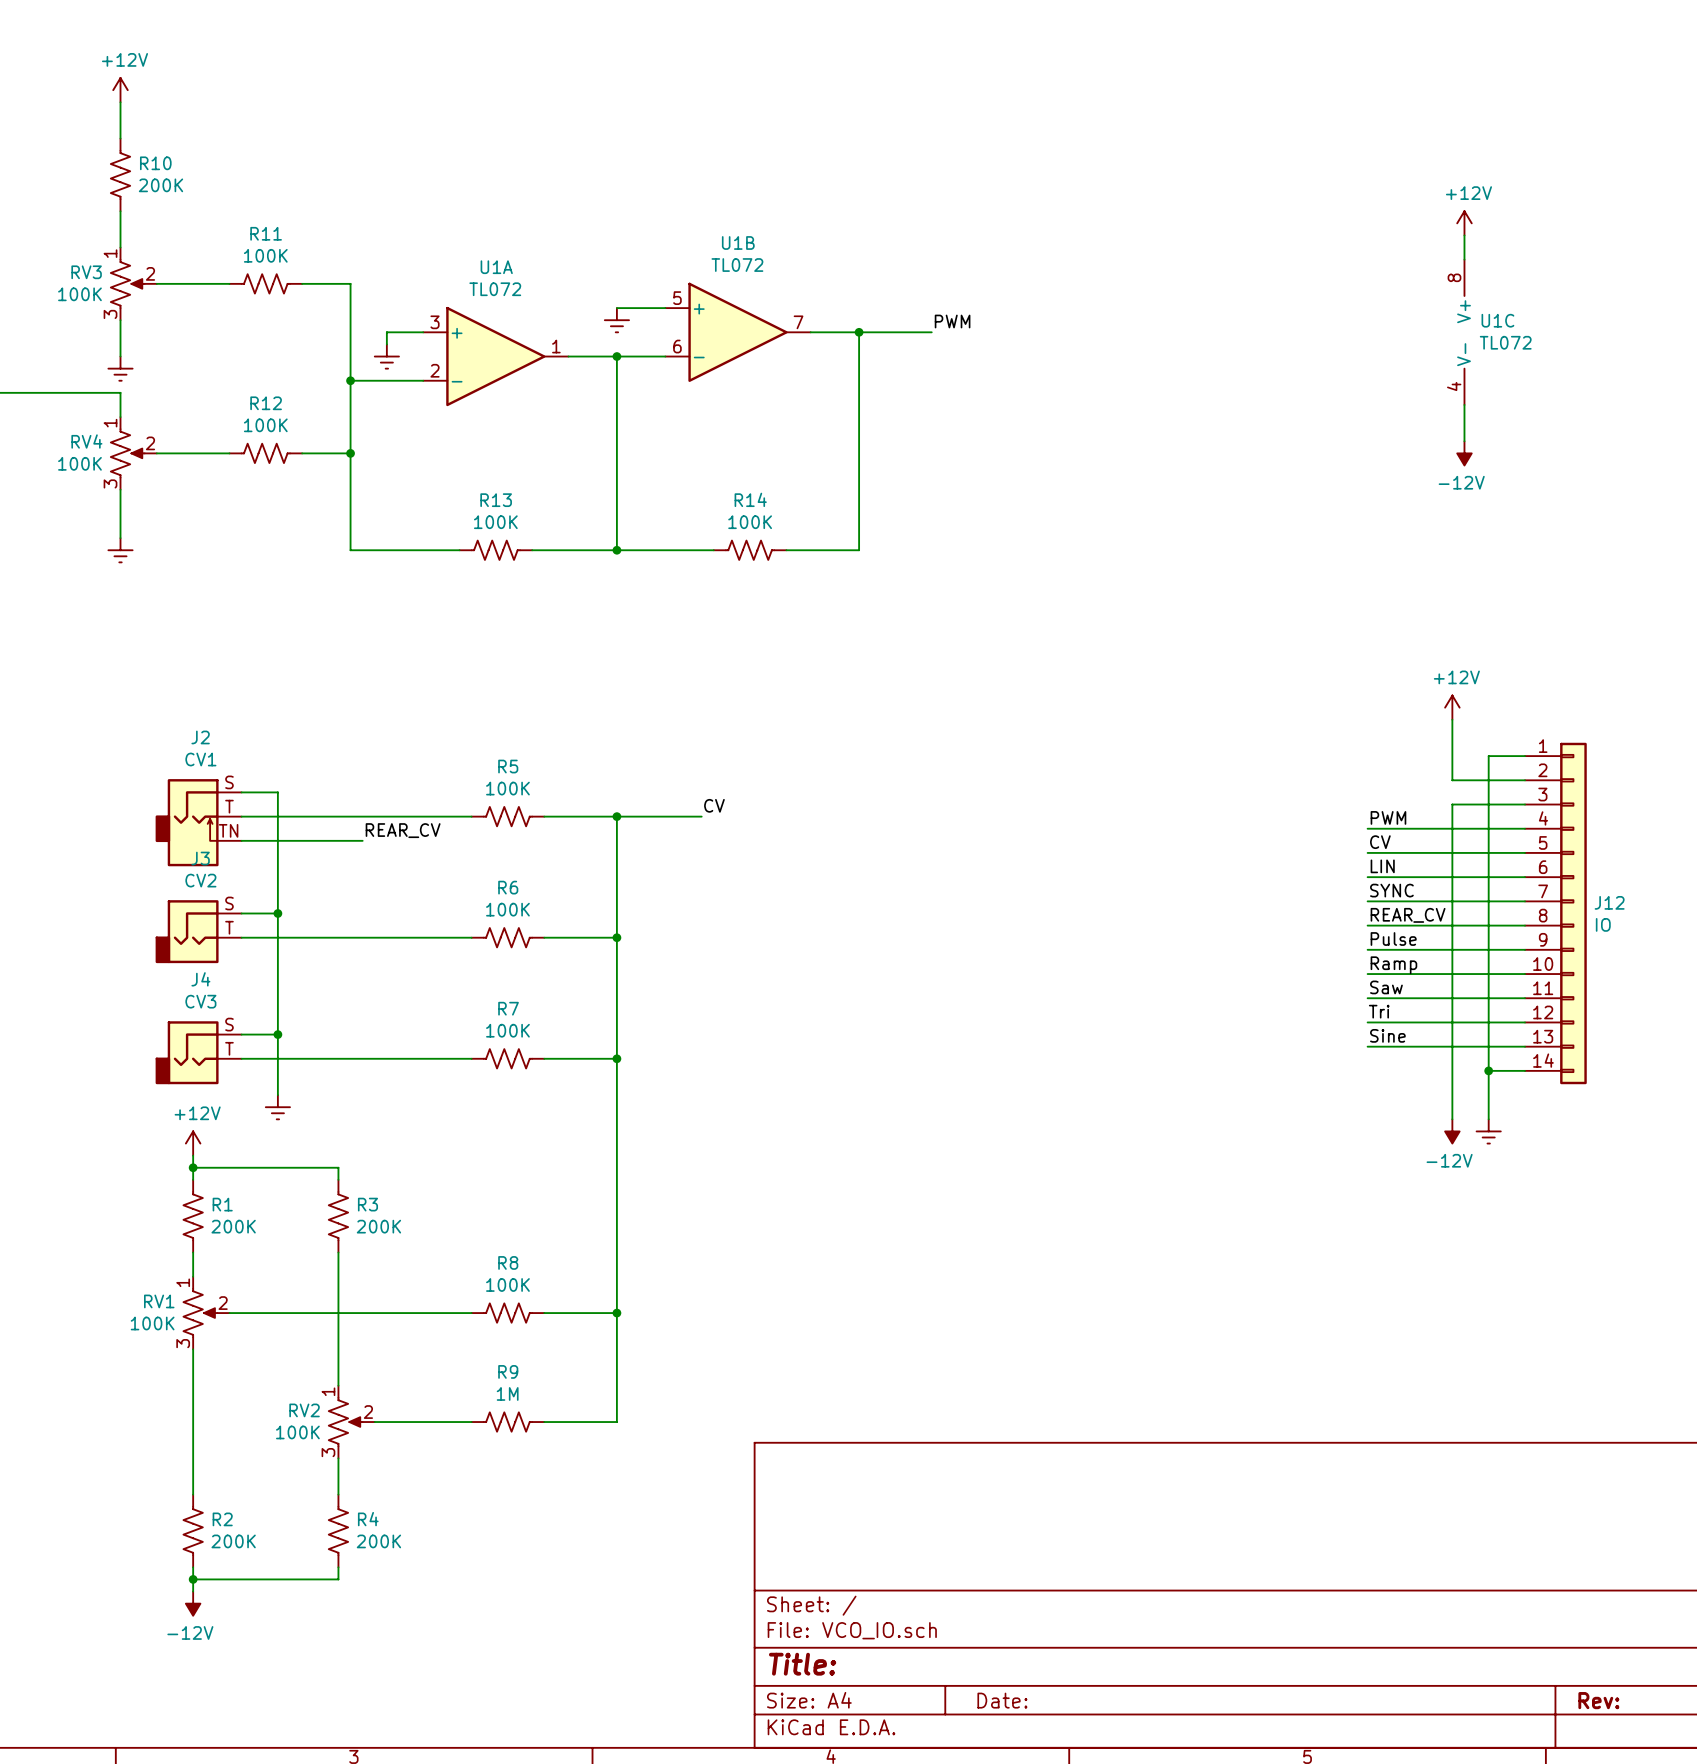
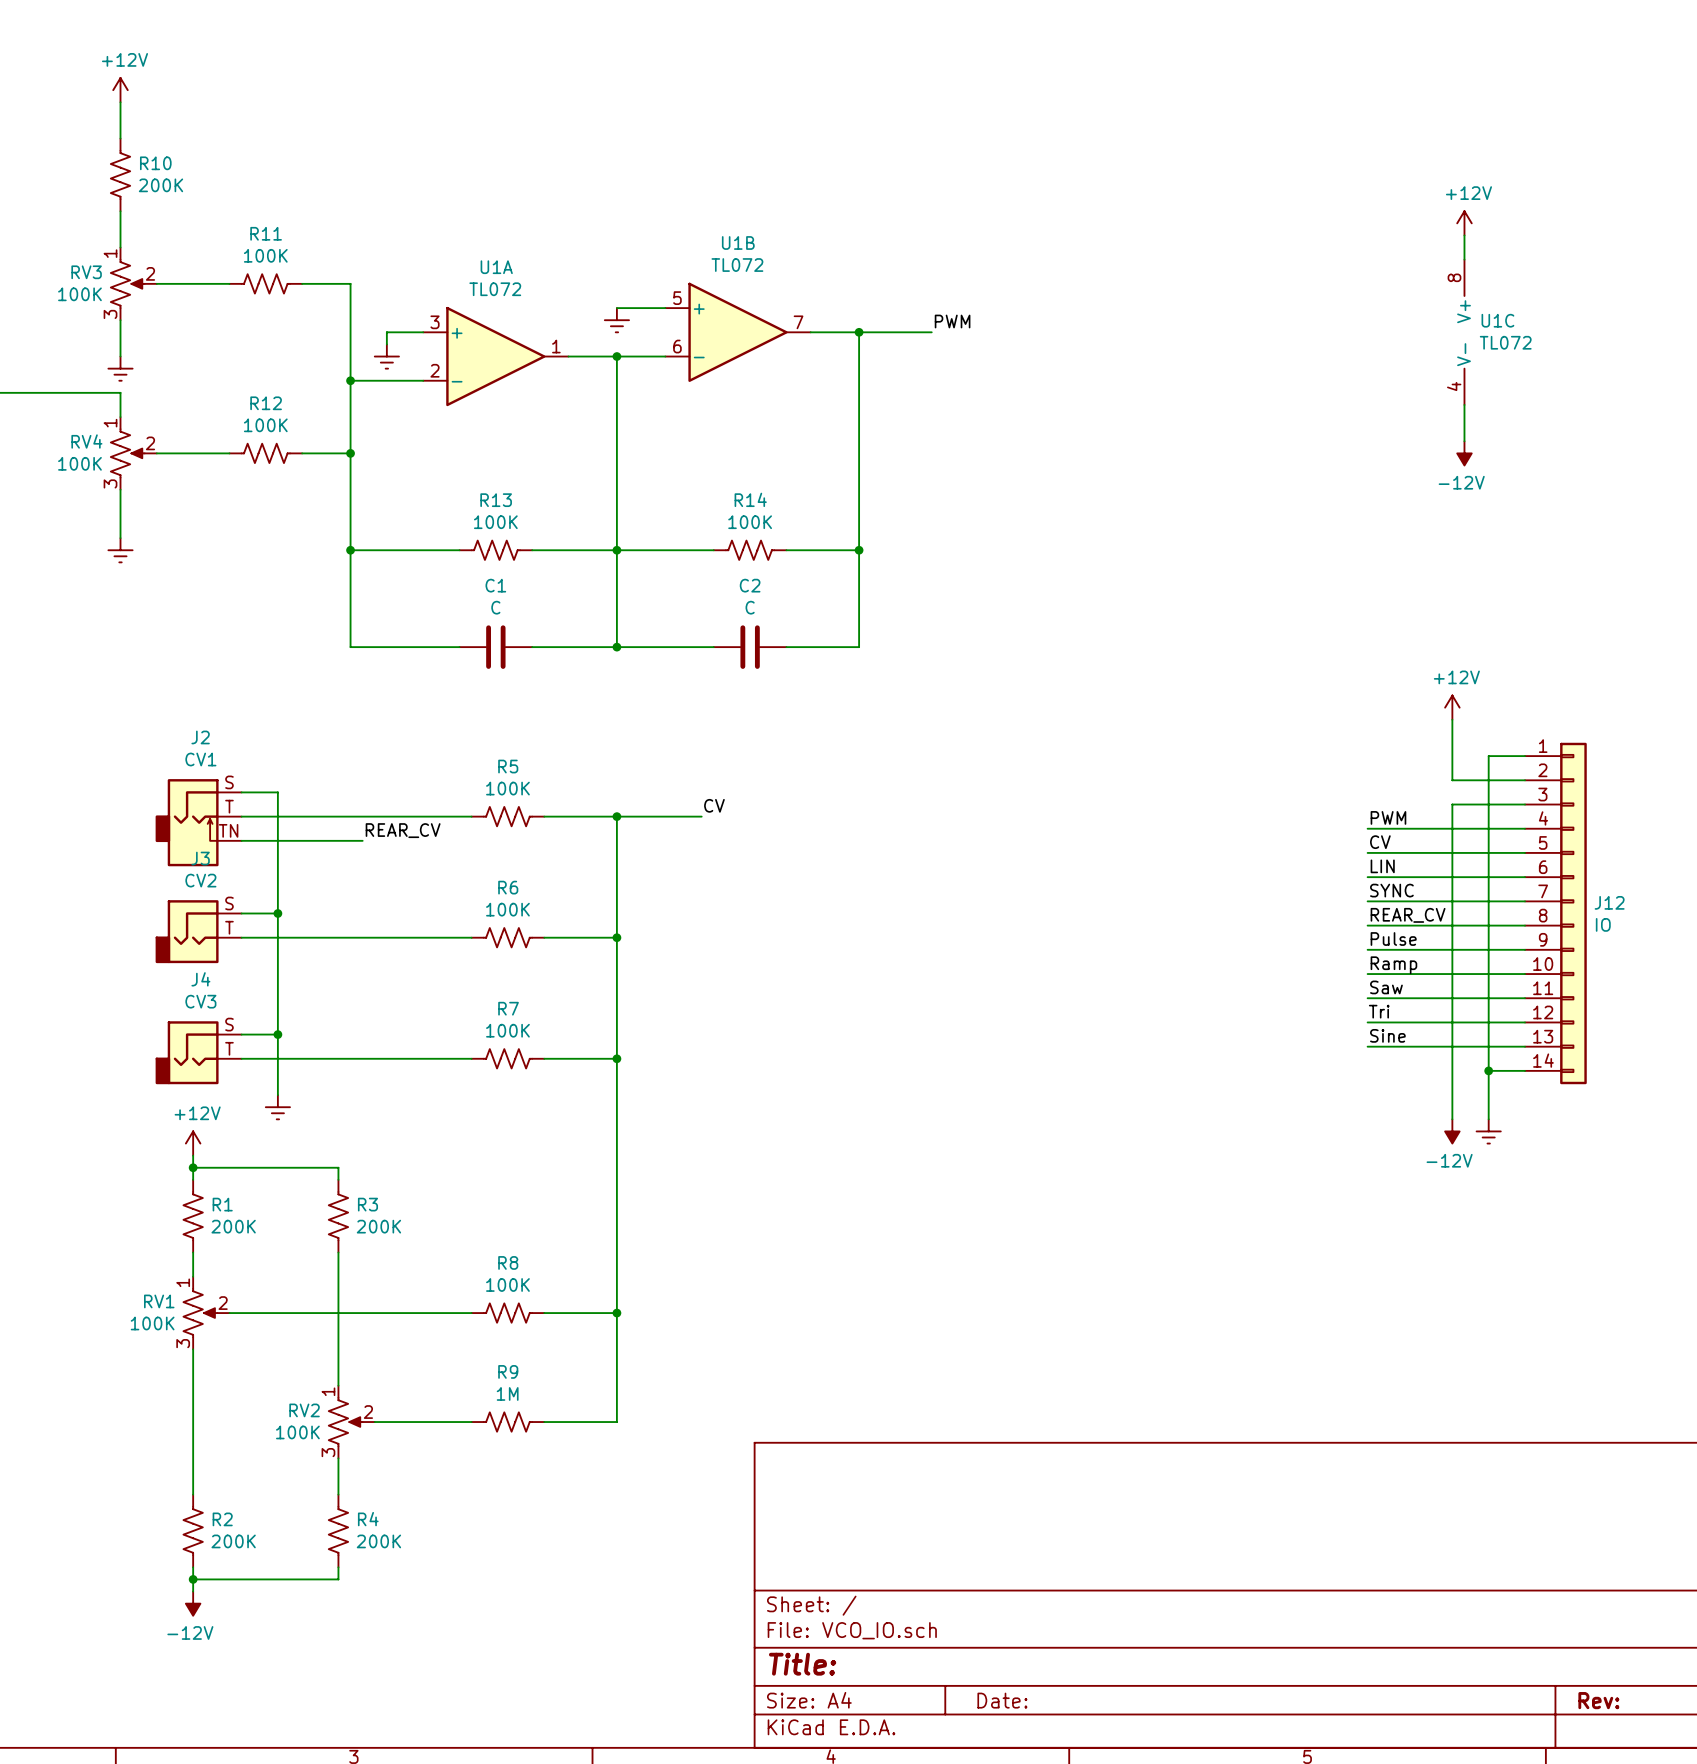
wire: none -> (350, 550) (350, 647) (459, 647)
junction: none -> (350, 550)
wire: none -> (616, 550) (616, 647)
wire: none -> (859, 550) (859, 647) (786, 647)
junction: none -> (859, 550)
C1: none -> C (495, 647)
wire: none -> (532, 647) (713, 647)
junction: none -> (616, 647)
C2: none -> C (750, 647)

